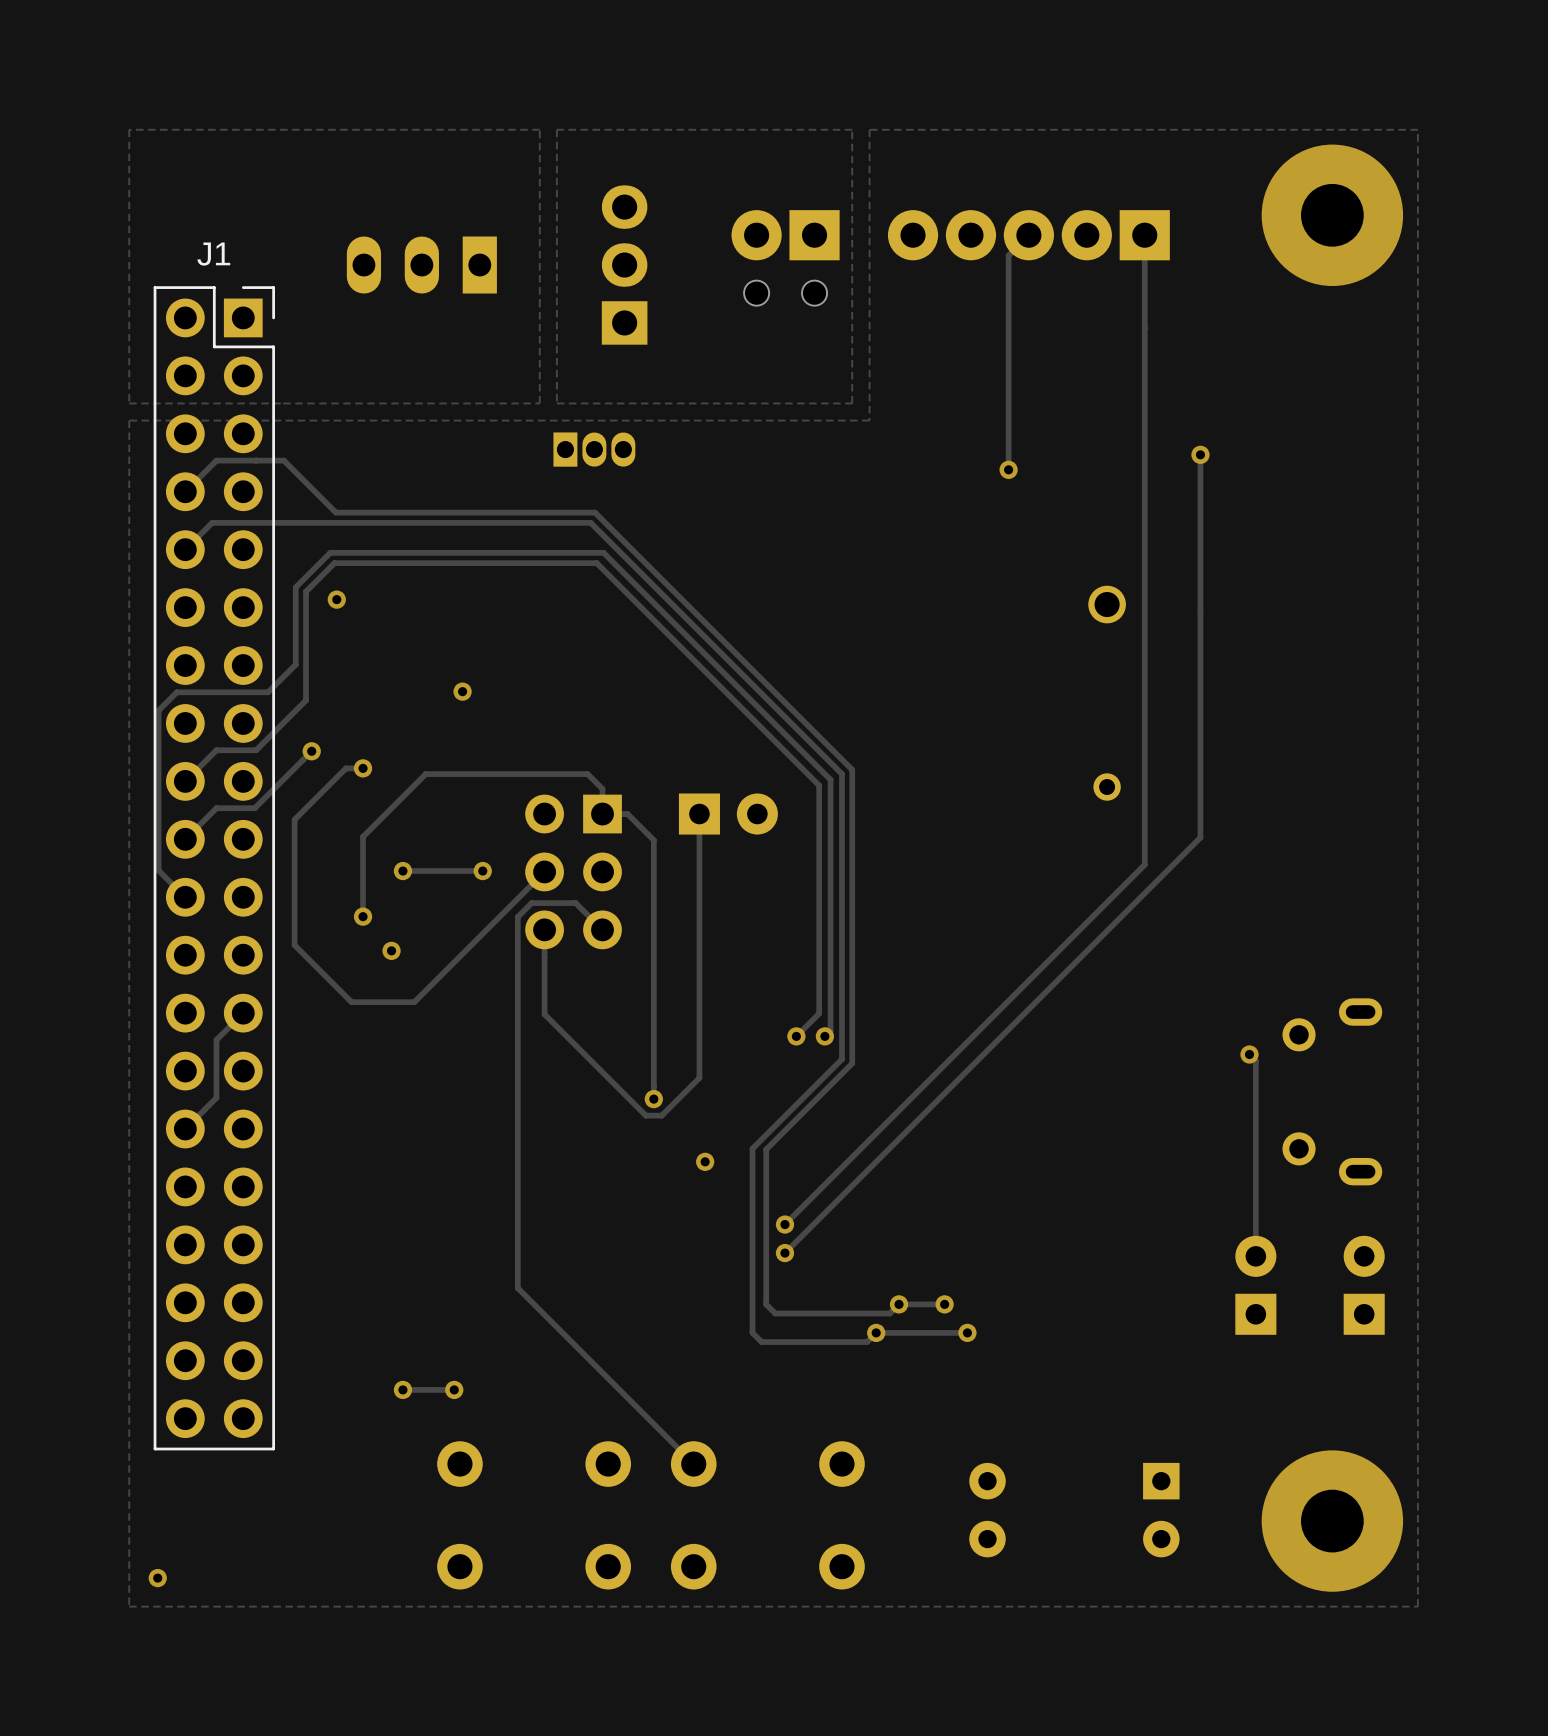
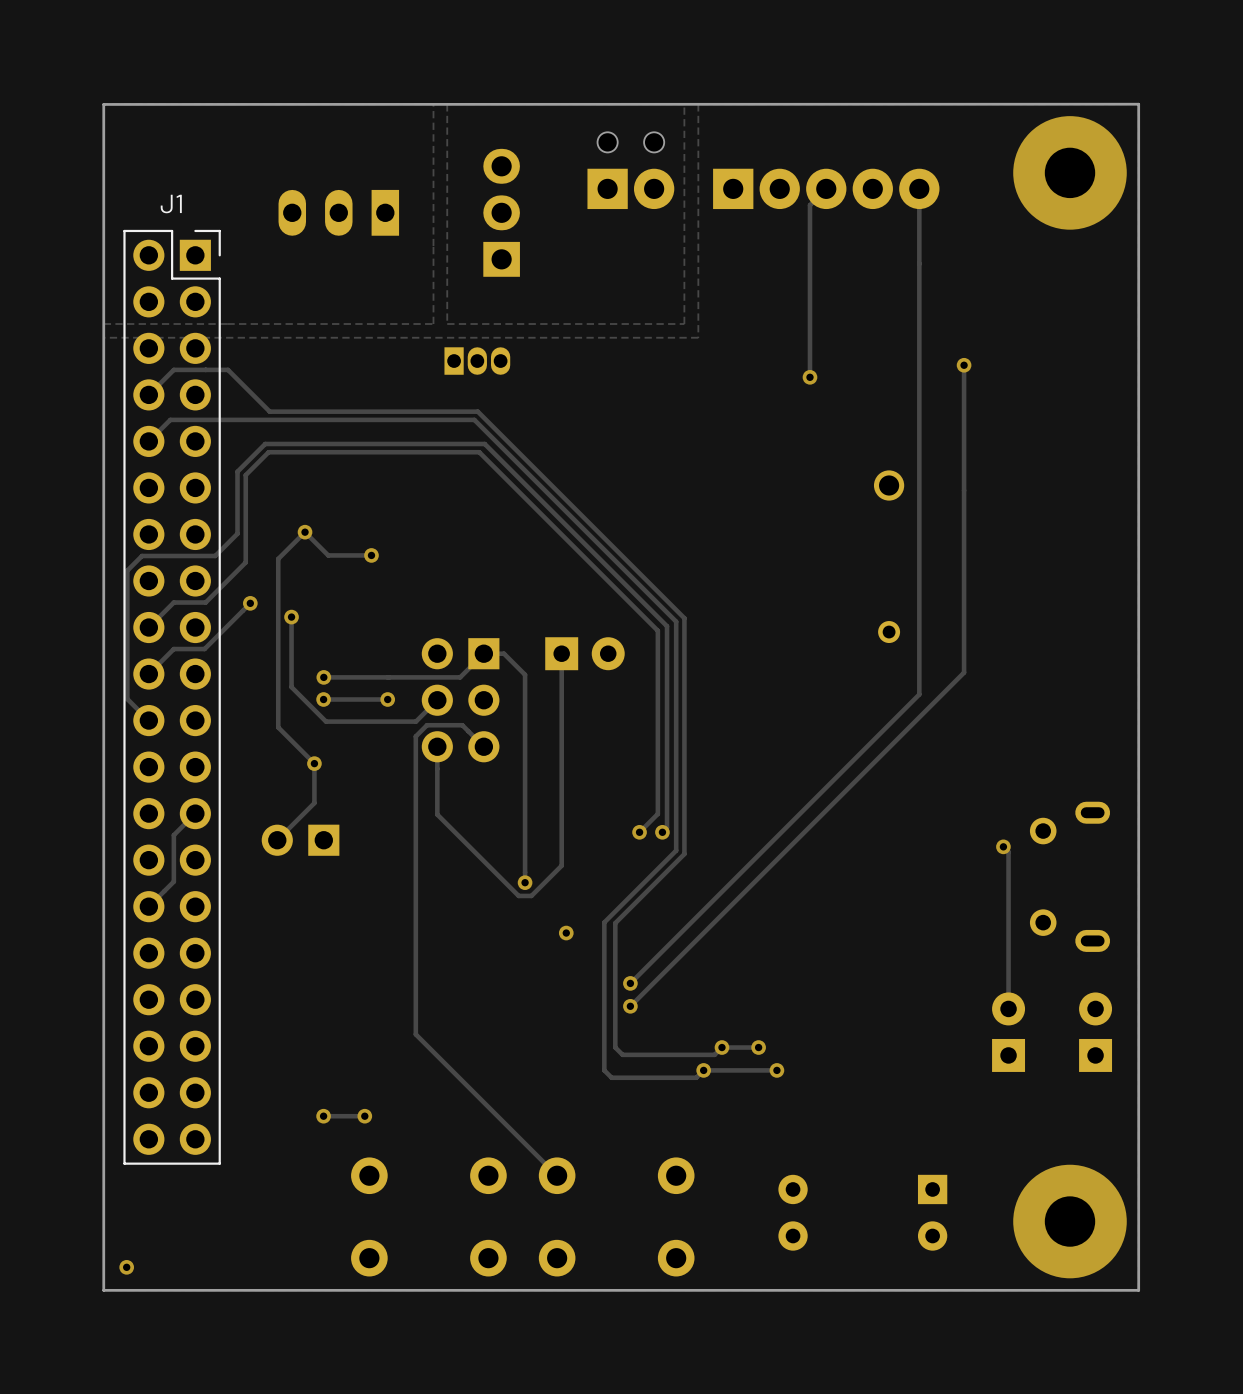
board edge: none -> (1138, 104) (1138, 1290) (103, 1290) (103, 104) (1138, 104)
part rotation: 0° (1028, 235) -> 180° (826, 188)
part rotation: 0° (785, 257) -> 180° (630, 170)
via position: (336, 599) -> (305, 532)
track: none -> (371, 555) (328, 555) (305, 532) (278, 558) (278, 727) (314, 763) (314, 803) (277, 840)
track: (363, 768) (345, 768) (294, 819) (294, 945) (351, 1002) (414, 1002) (517, 898) -> (291, 687) (326, 721) (415, 721)
track: none -> (291, 617) (291, 672)
track: (602, 814) (602, 788) (587, 774) (425, 774) (363, 836) -> (483, 653) (460, 677) (323, 677)
track: (363, 855) (363, 916) -> none
via position: (363, 916) -> (323, 677)
part: none -> (300, 840)

